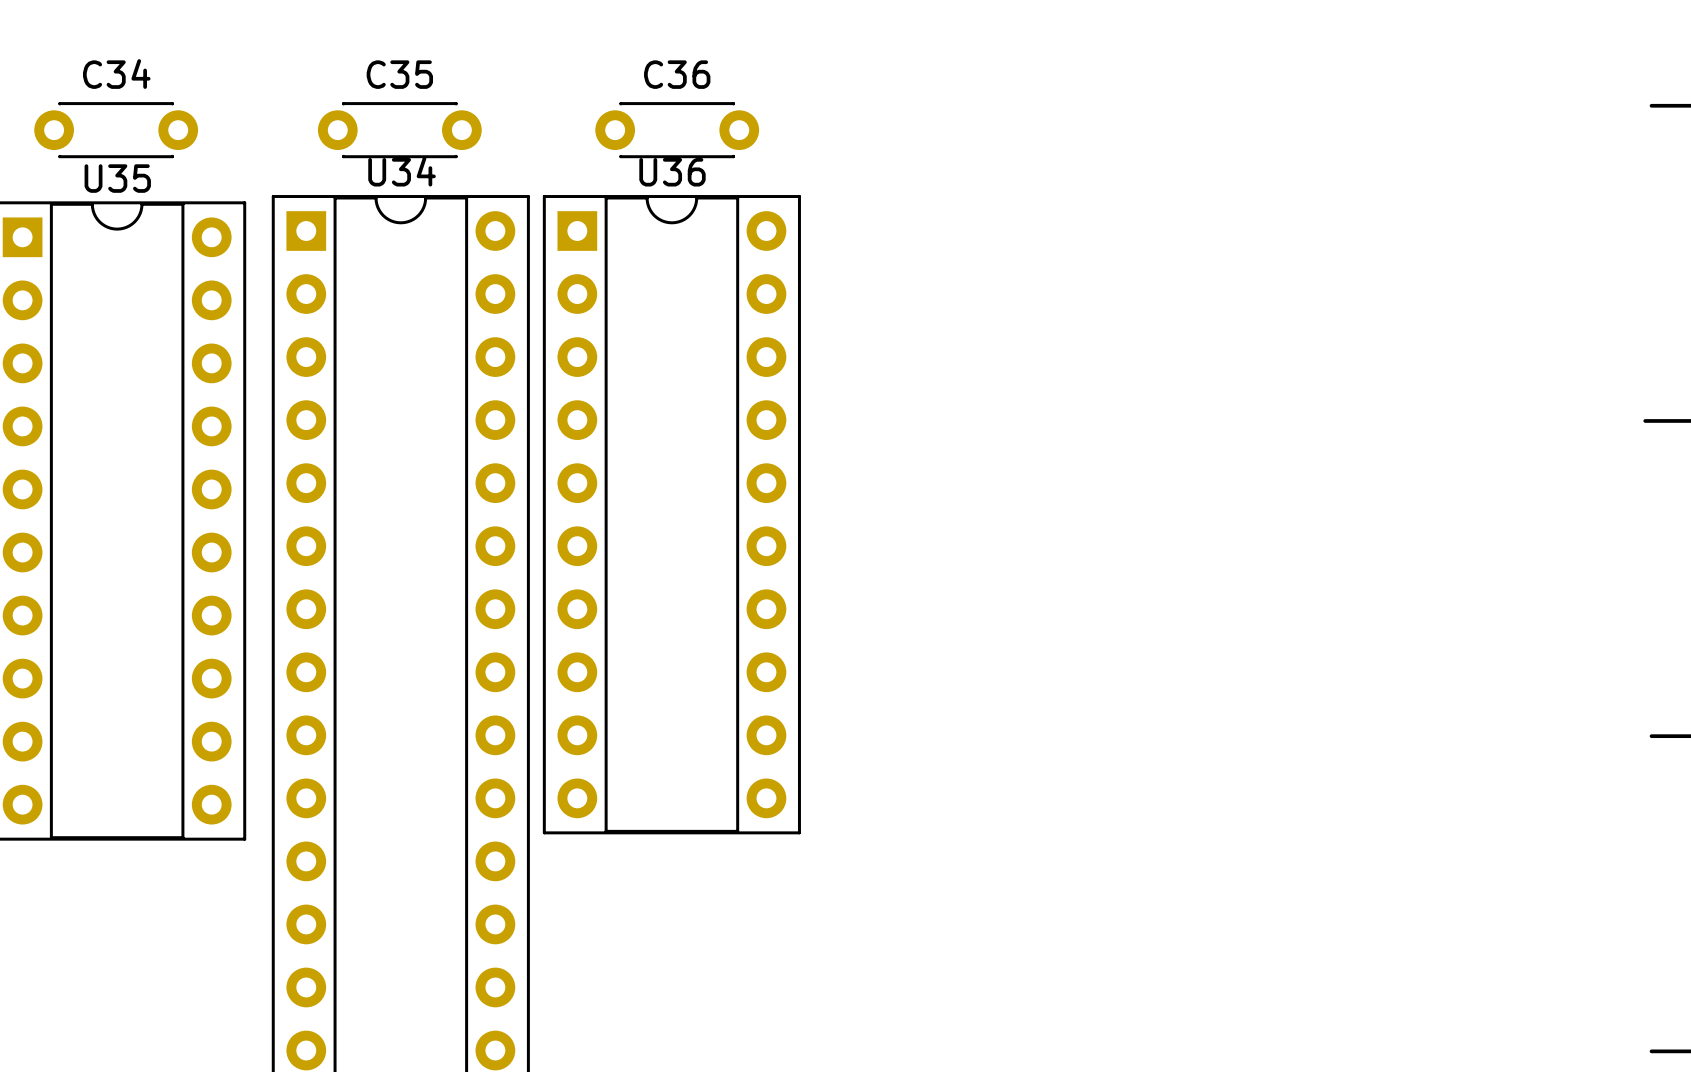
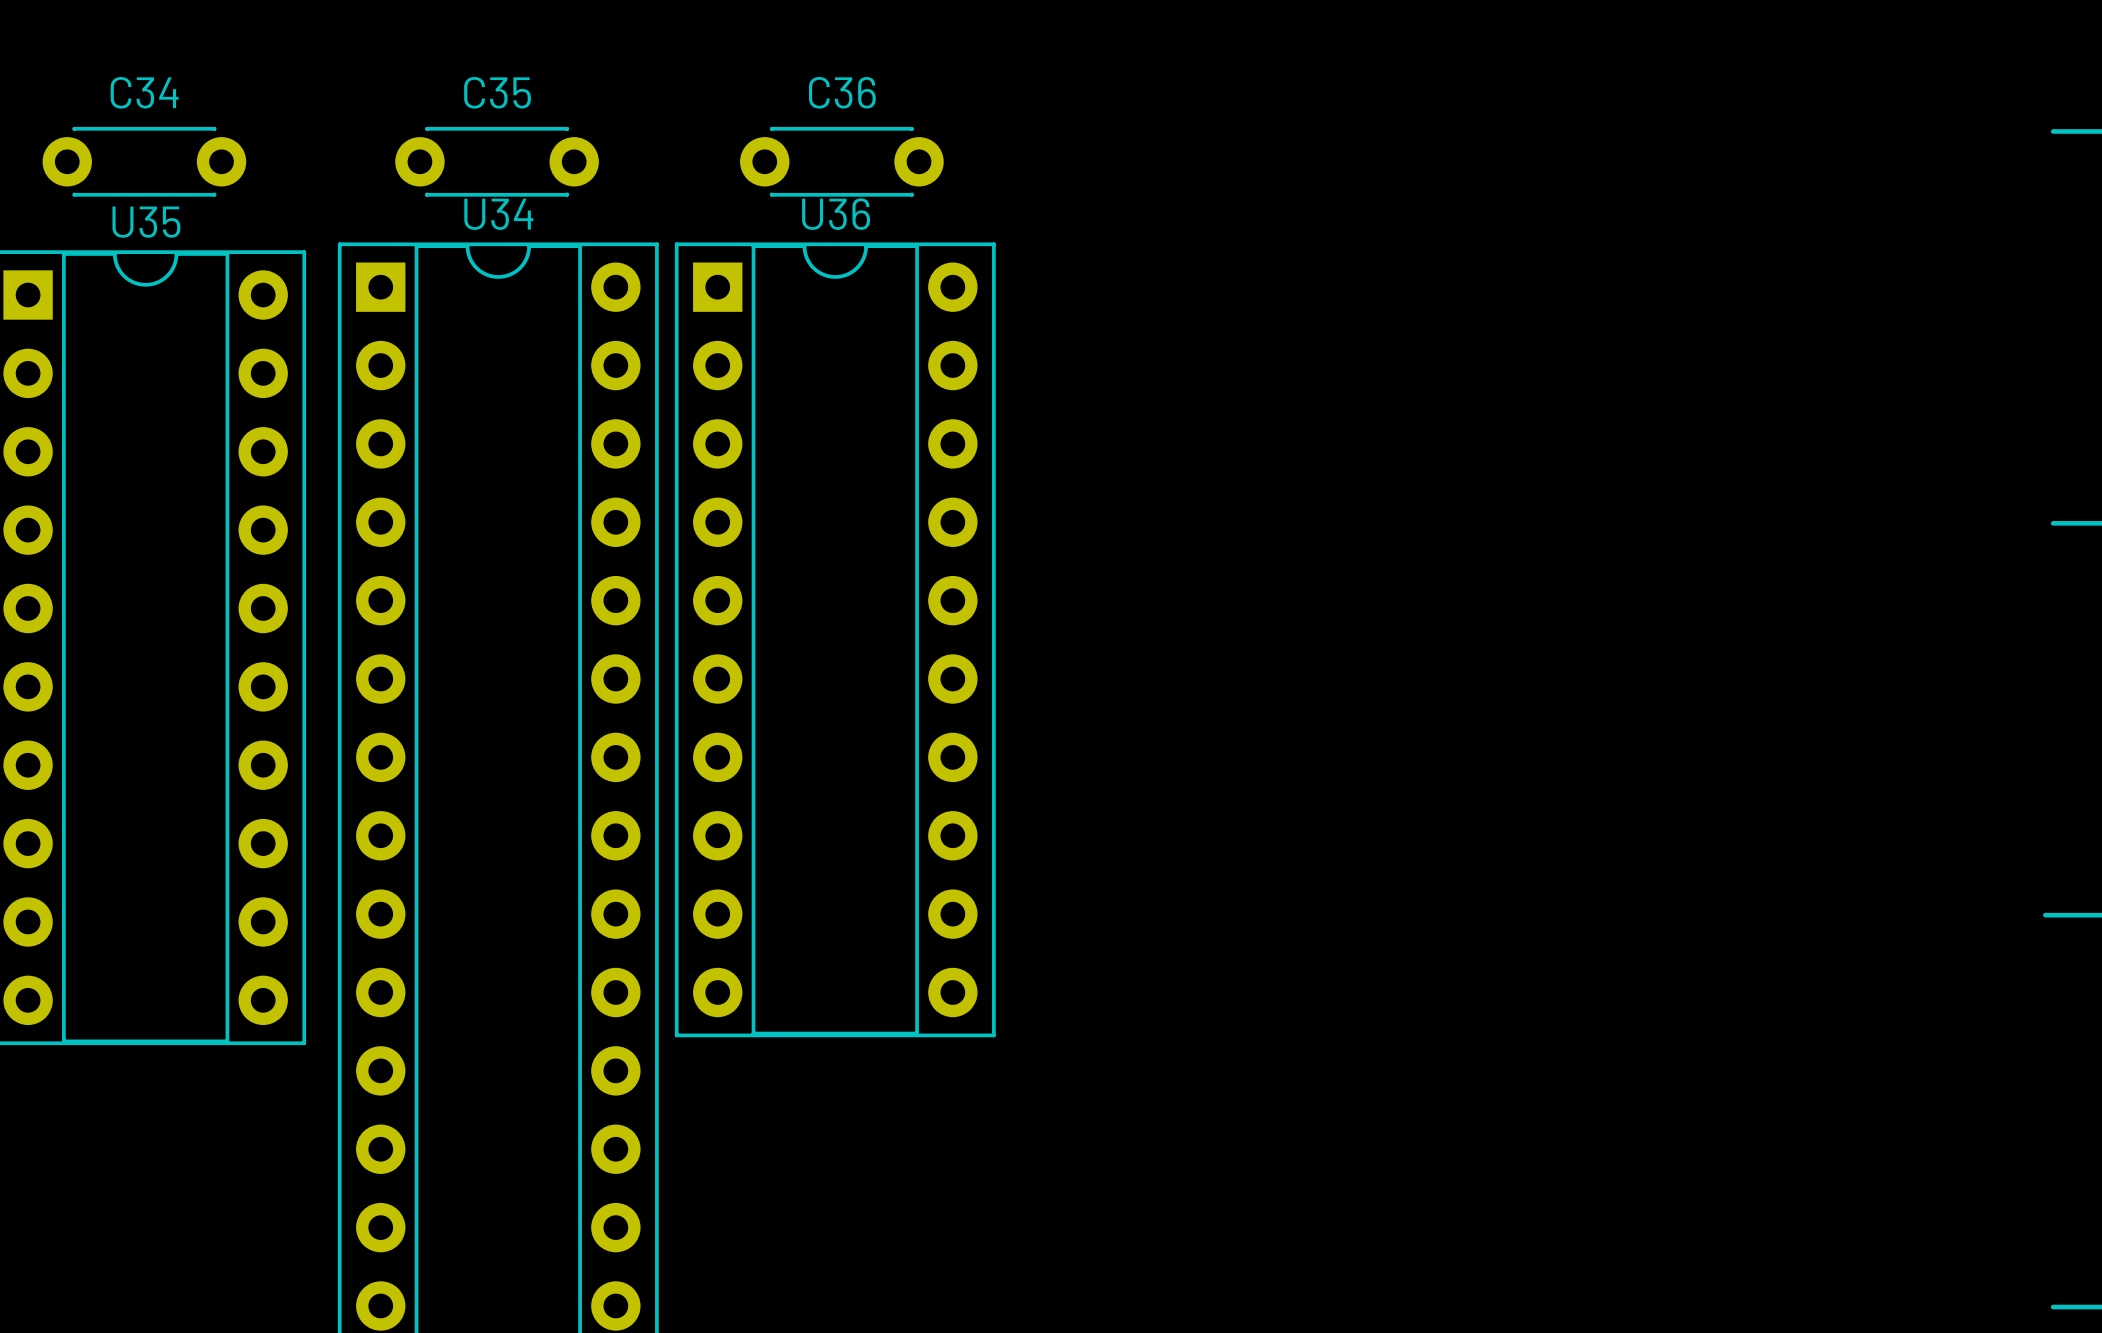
line: (1645, 420) (1651, 420) -> (2045, 915) (2053, 915)

